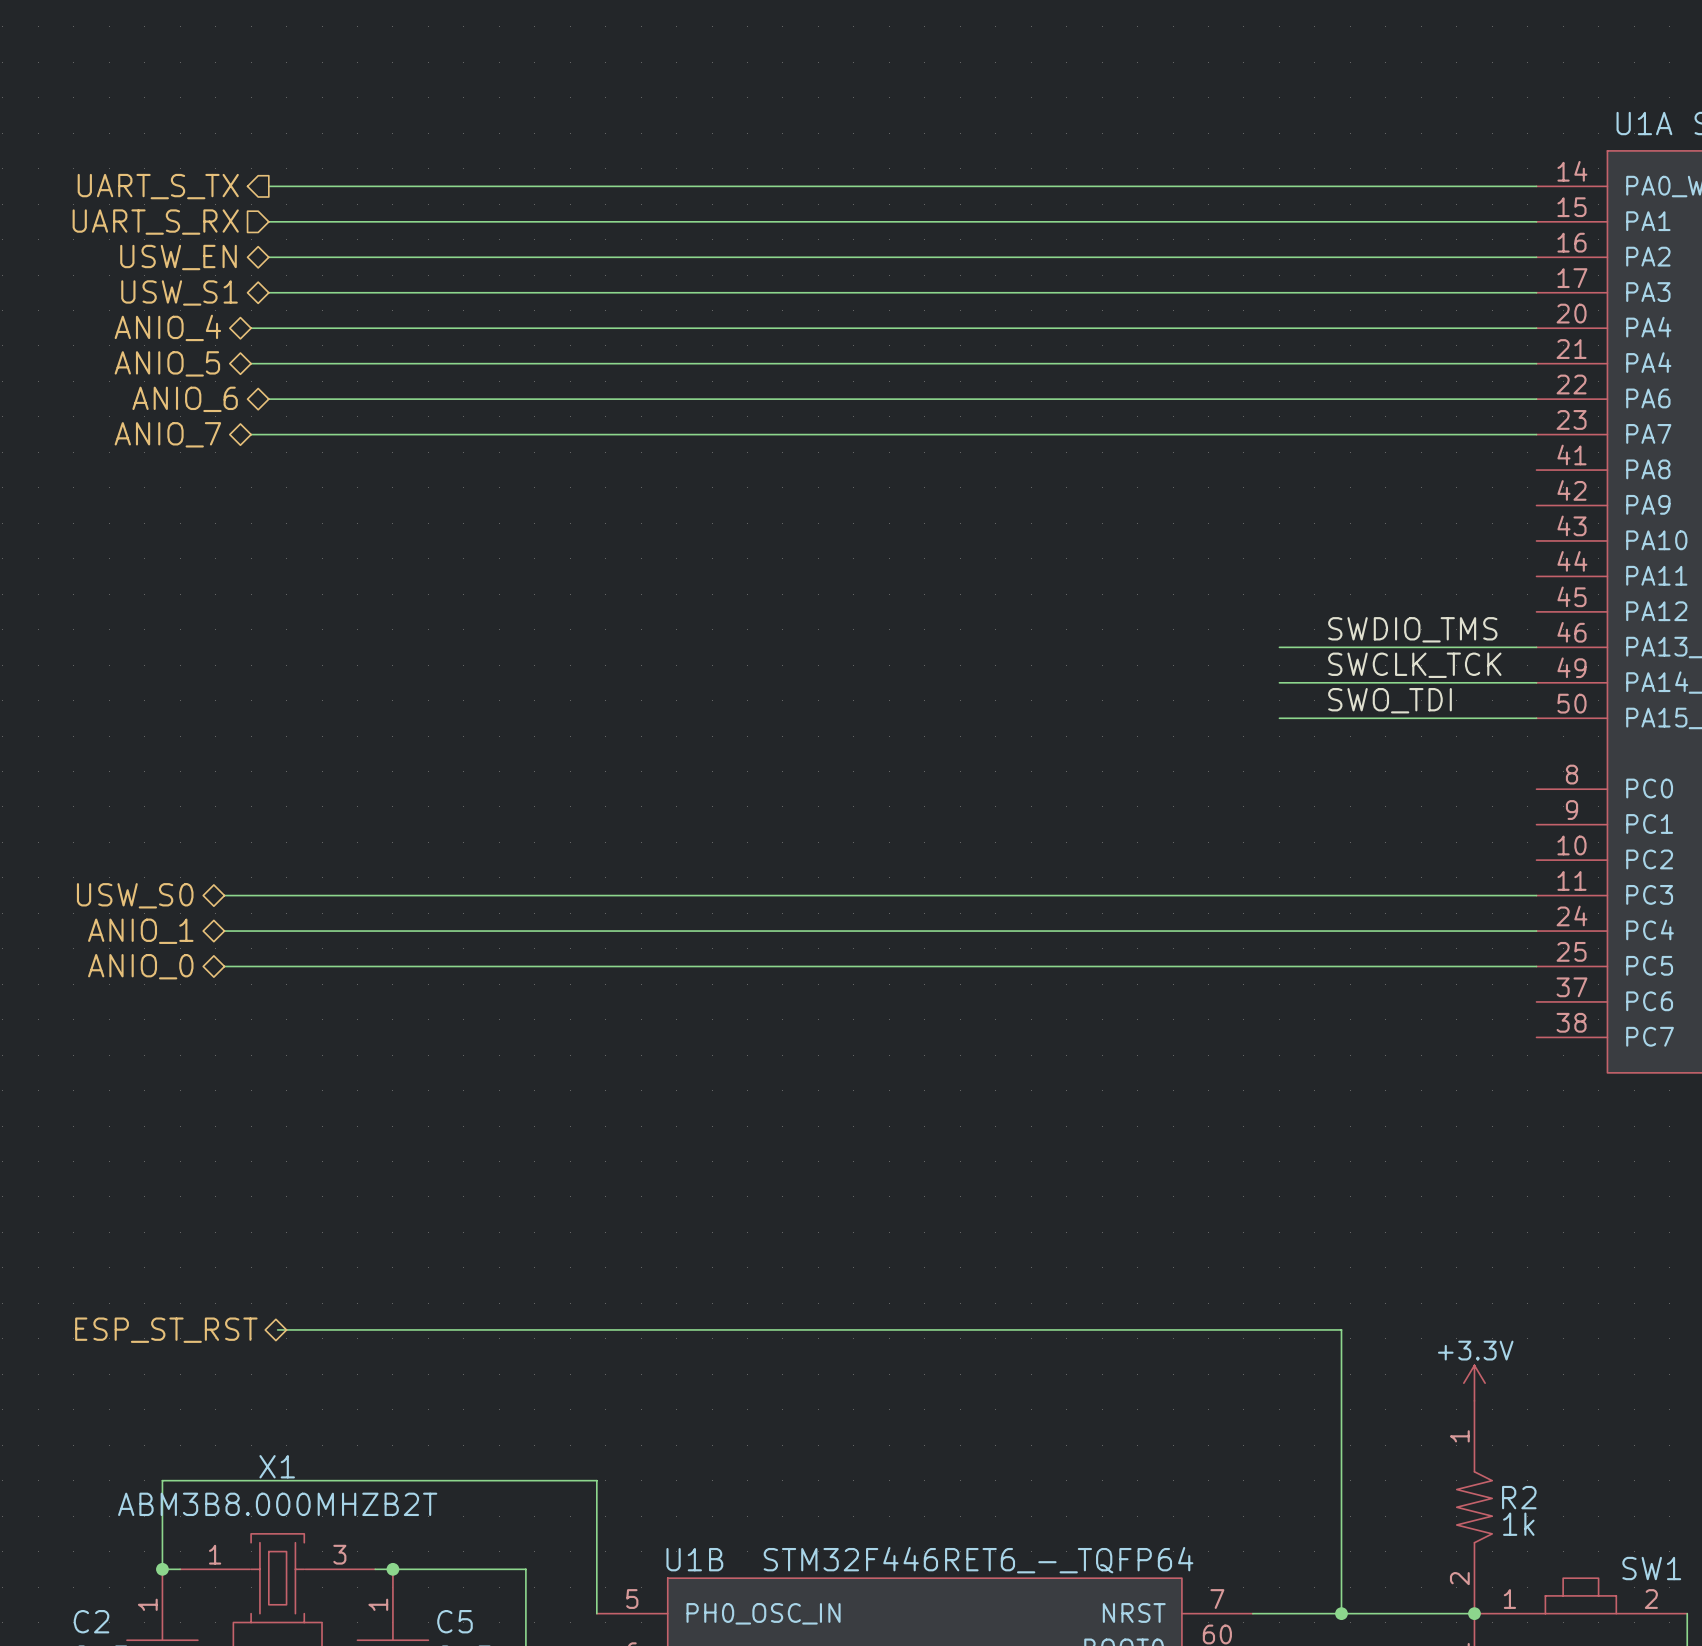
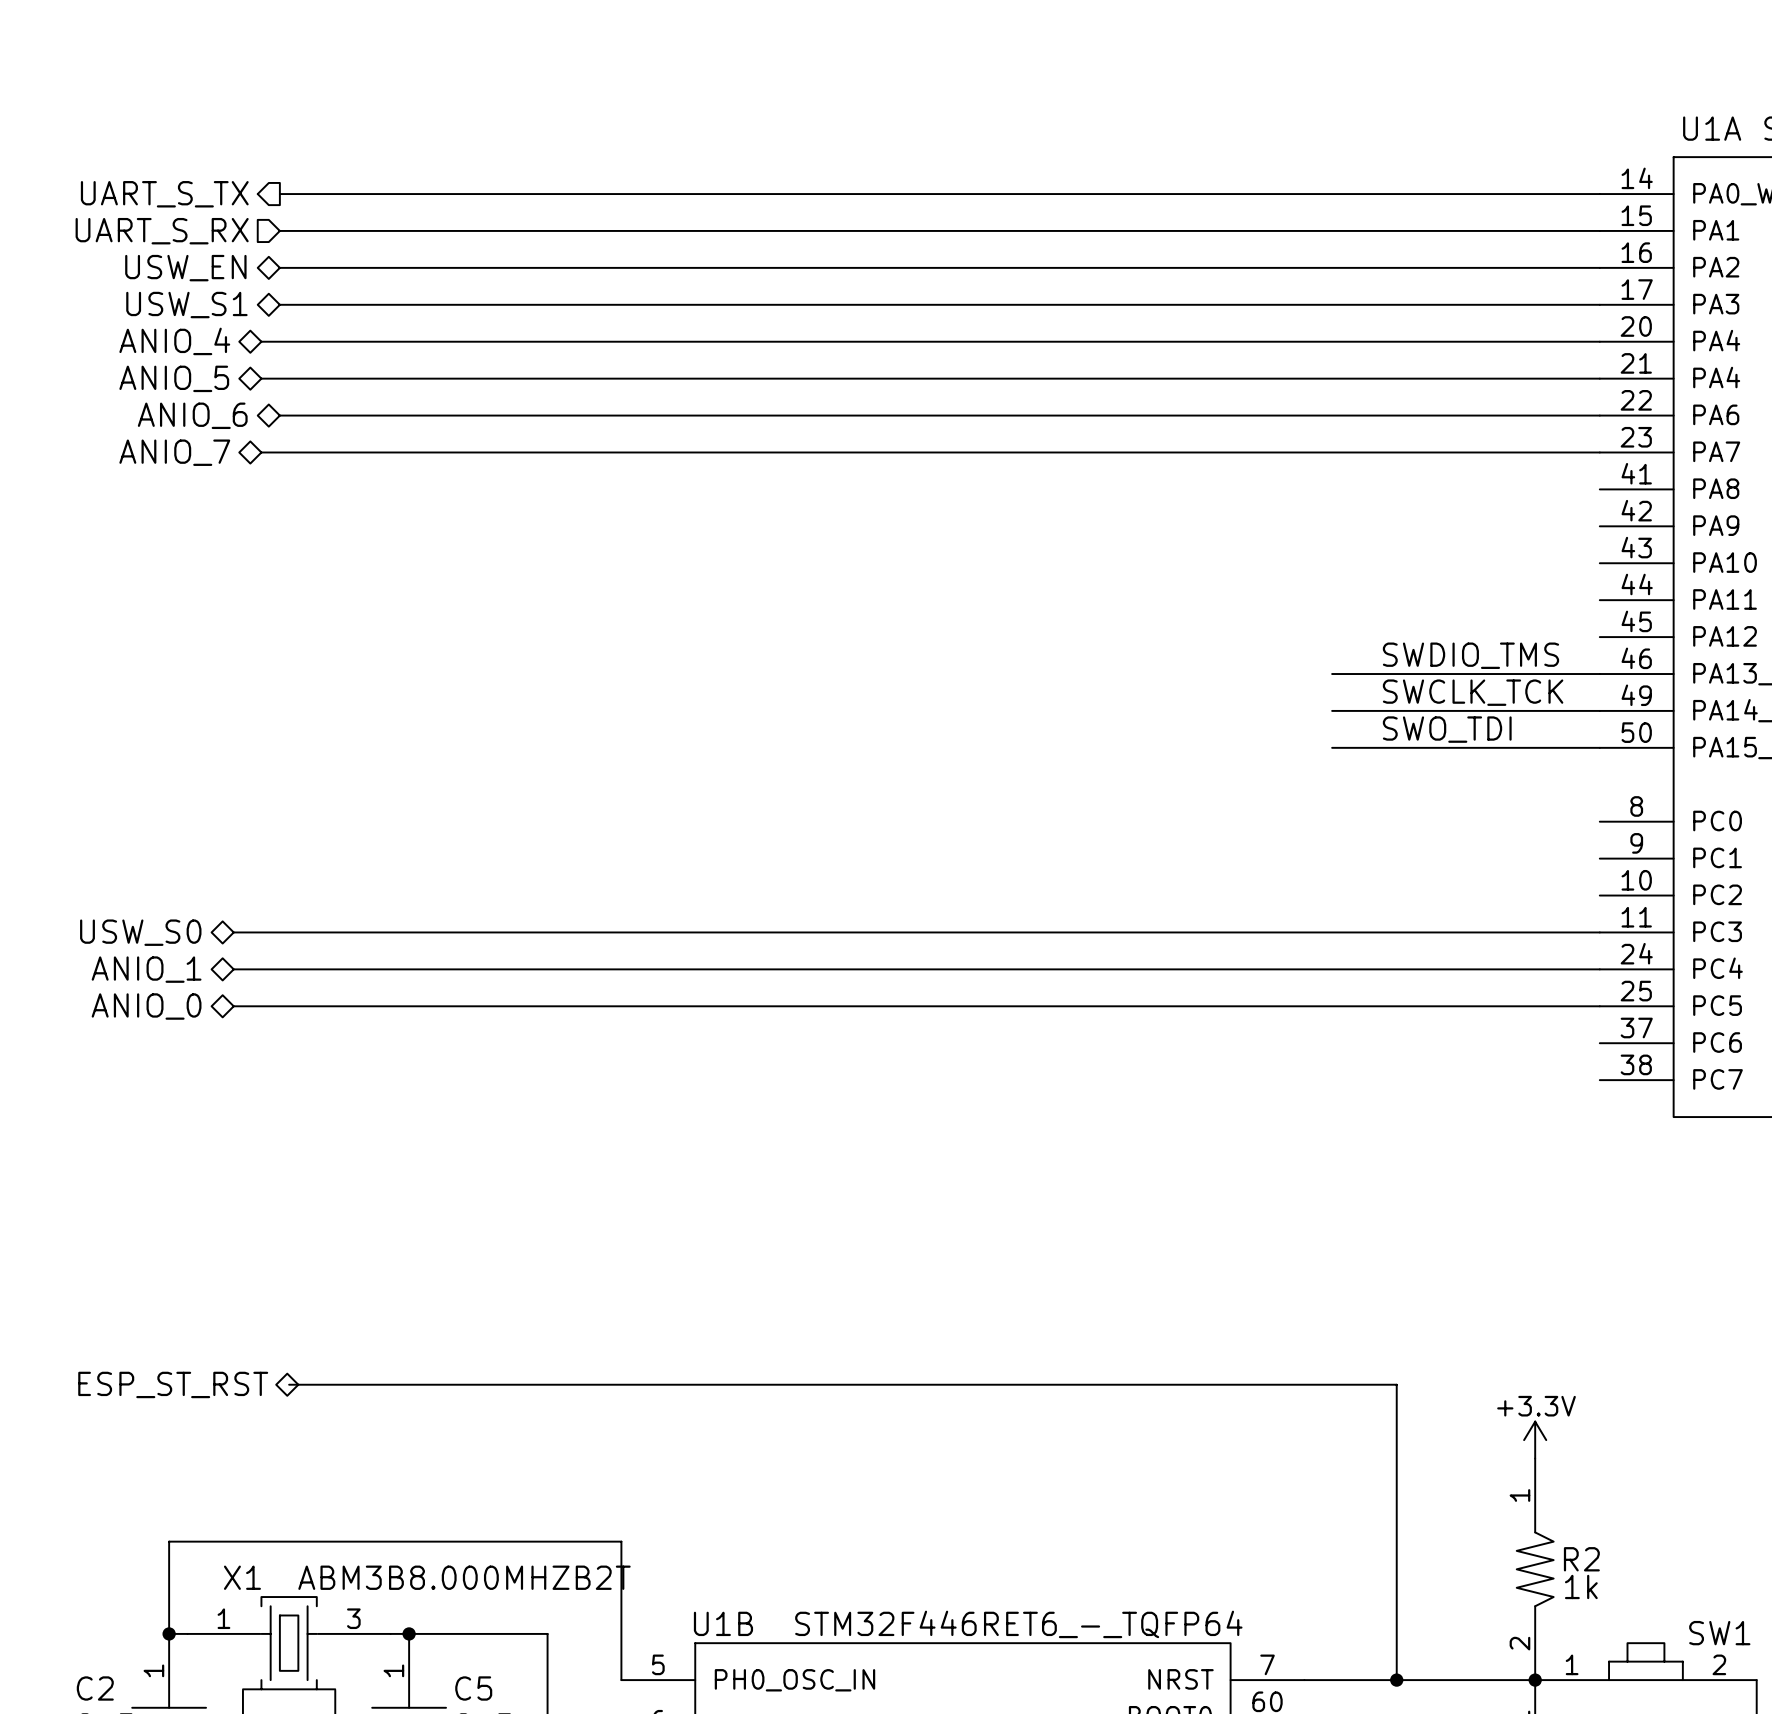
X1 name position: X1 (277, 1466) -> X1 (242, 1577)
X1 value position: ABM3B8.000MHZB2T (277, 1504) -> ABM3B8.000MHZB2T (464, 1577)

